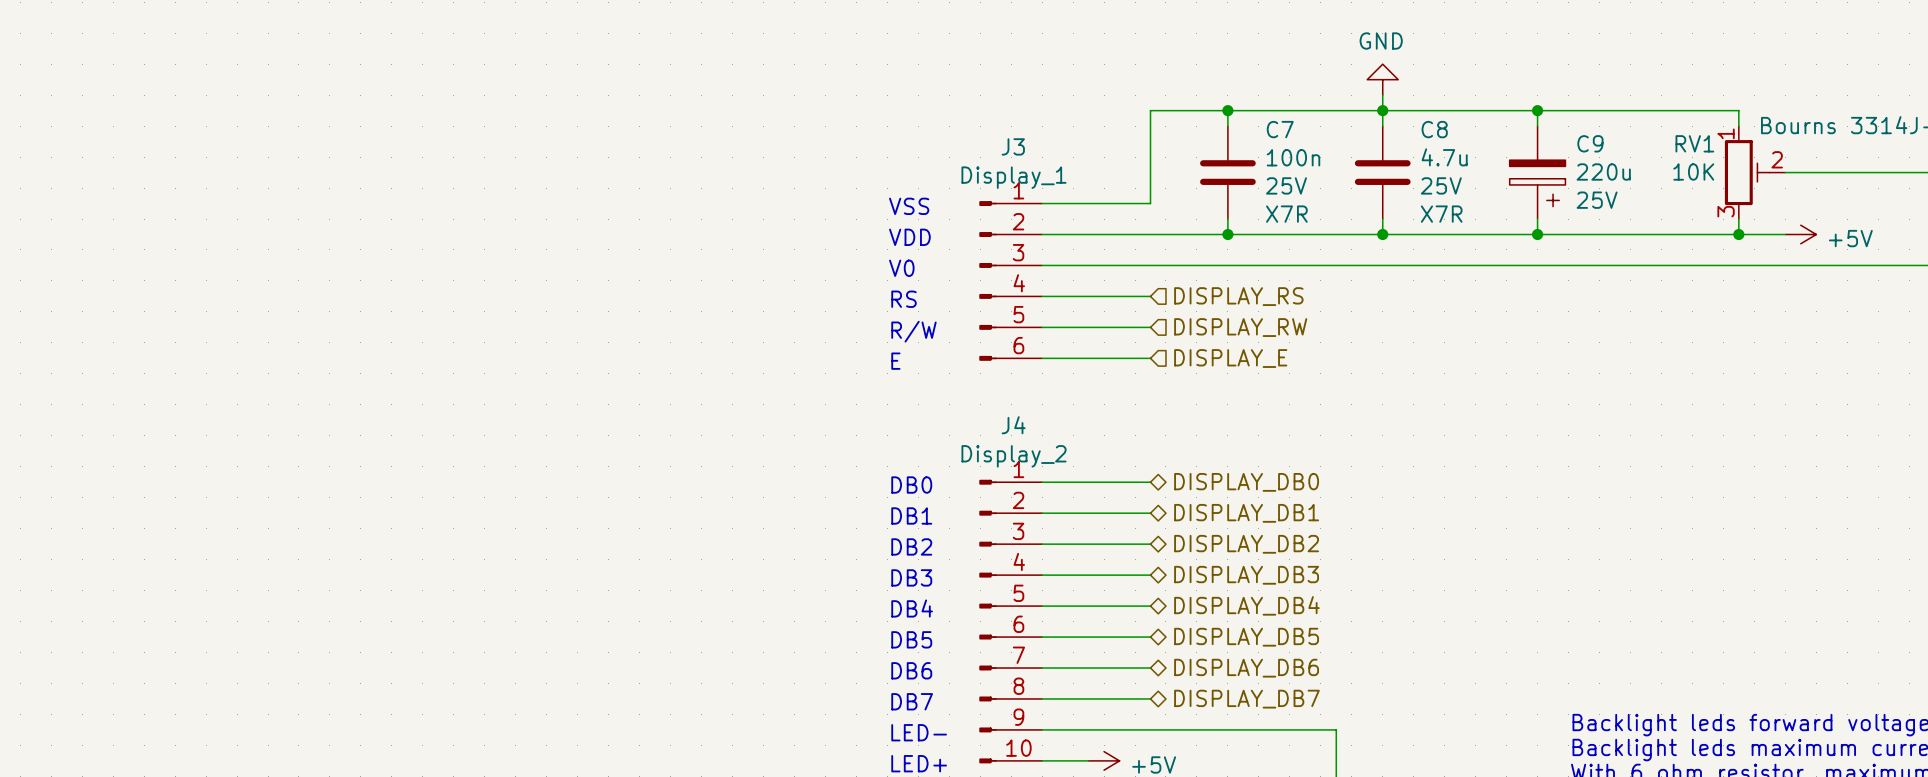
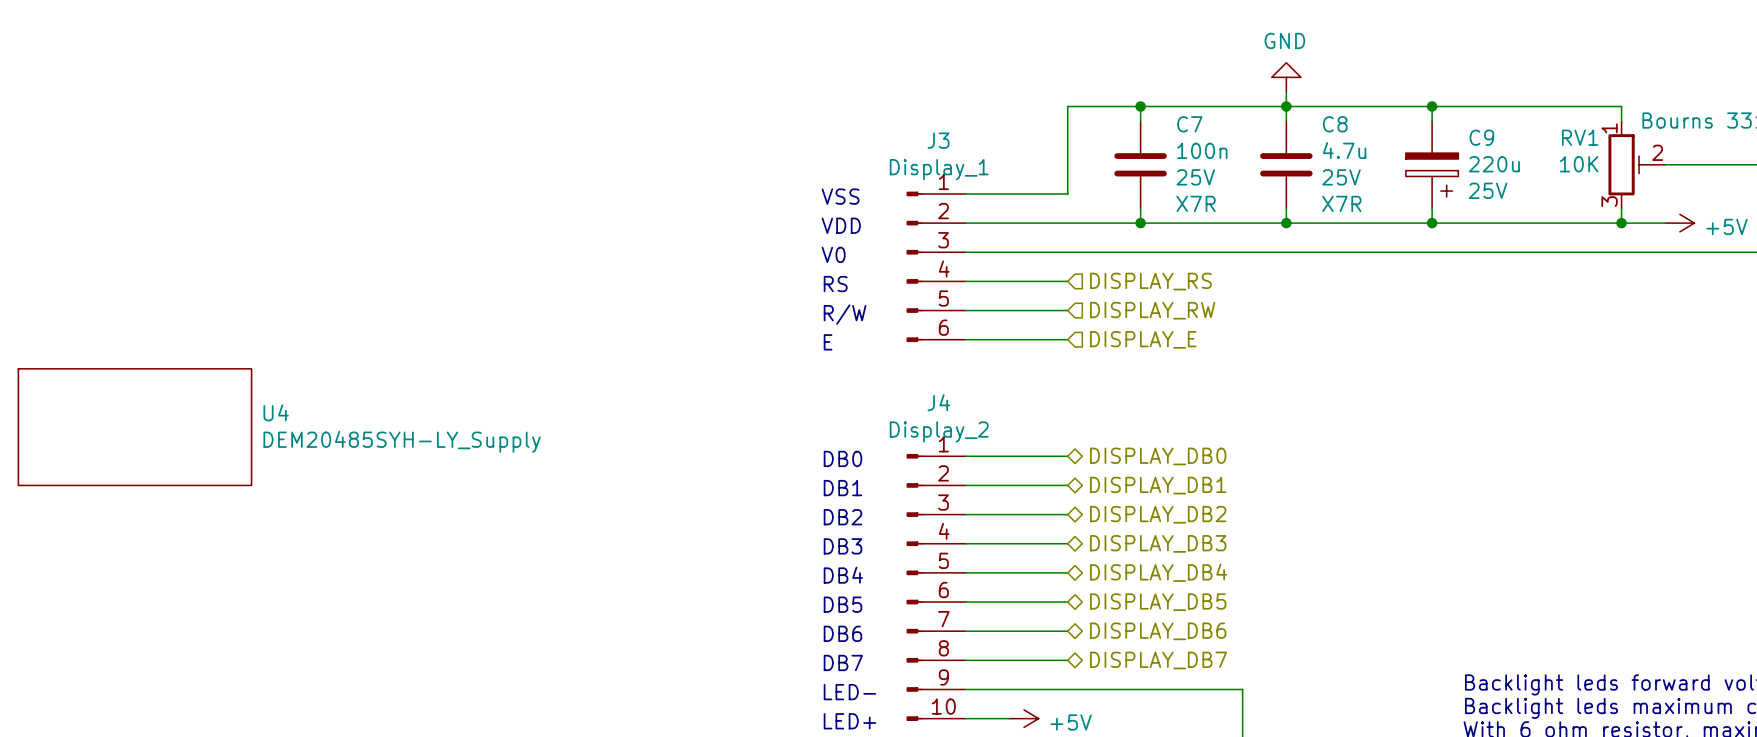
U4: none -> DEM20485SYH-LY_Supply (134, 427)

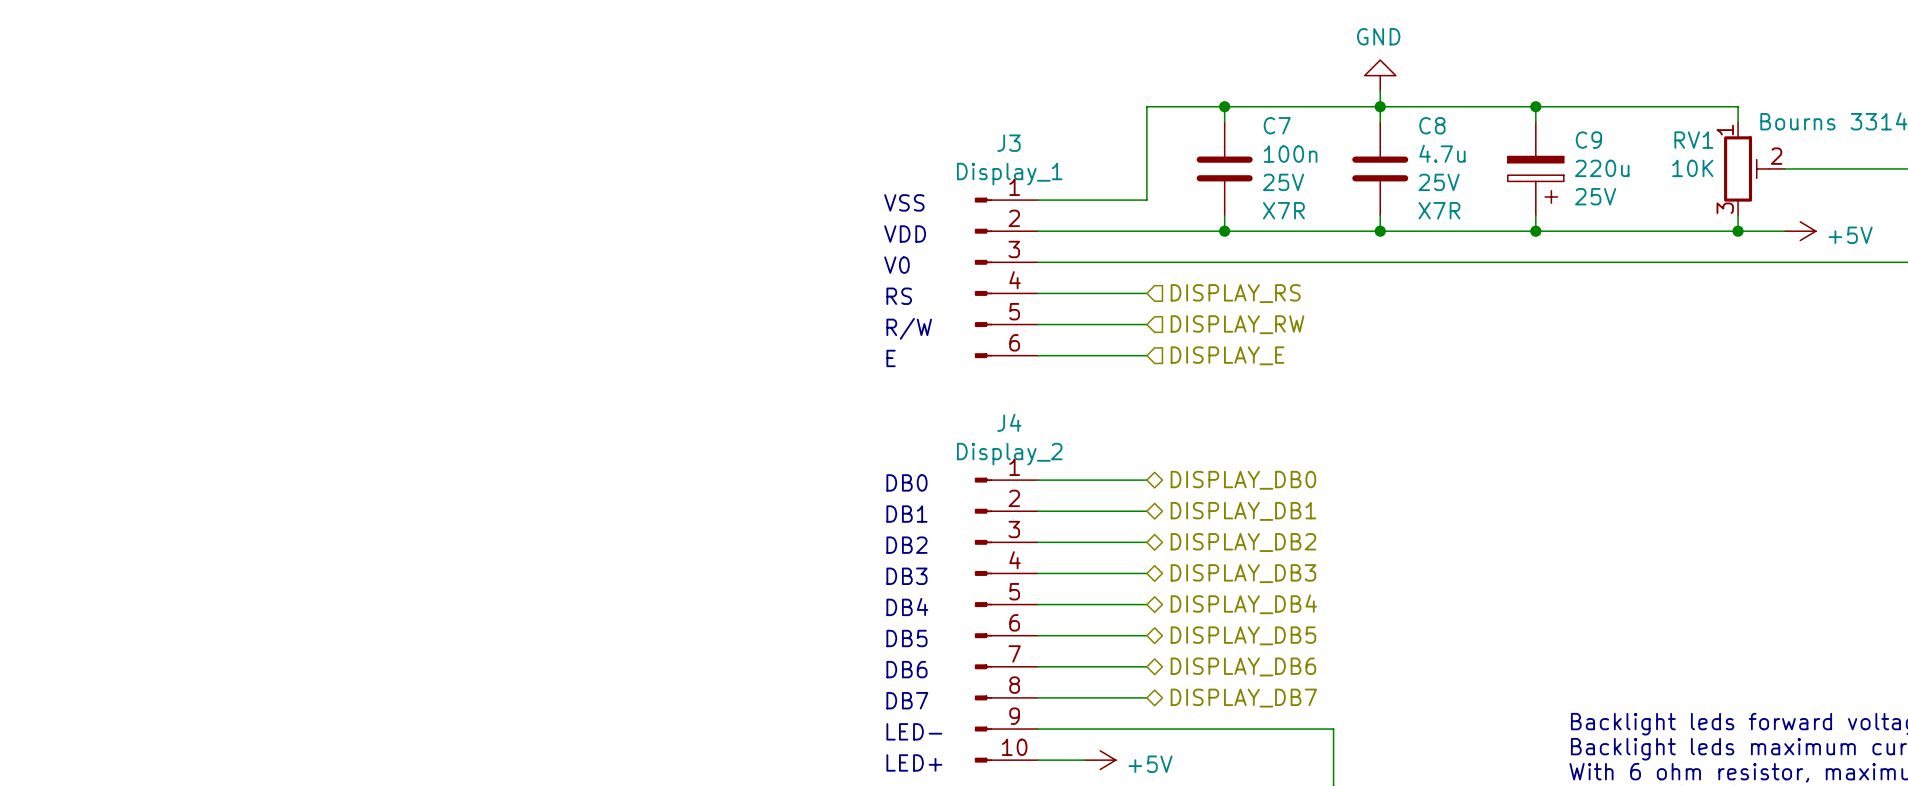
U4: DEM20485SYH-LY_Supply (134, 427) -> none

